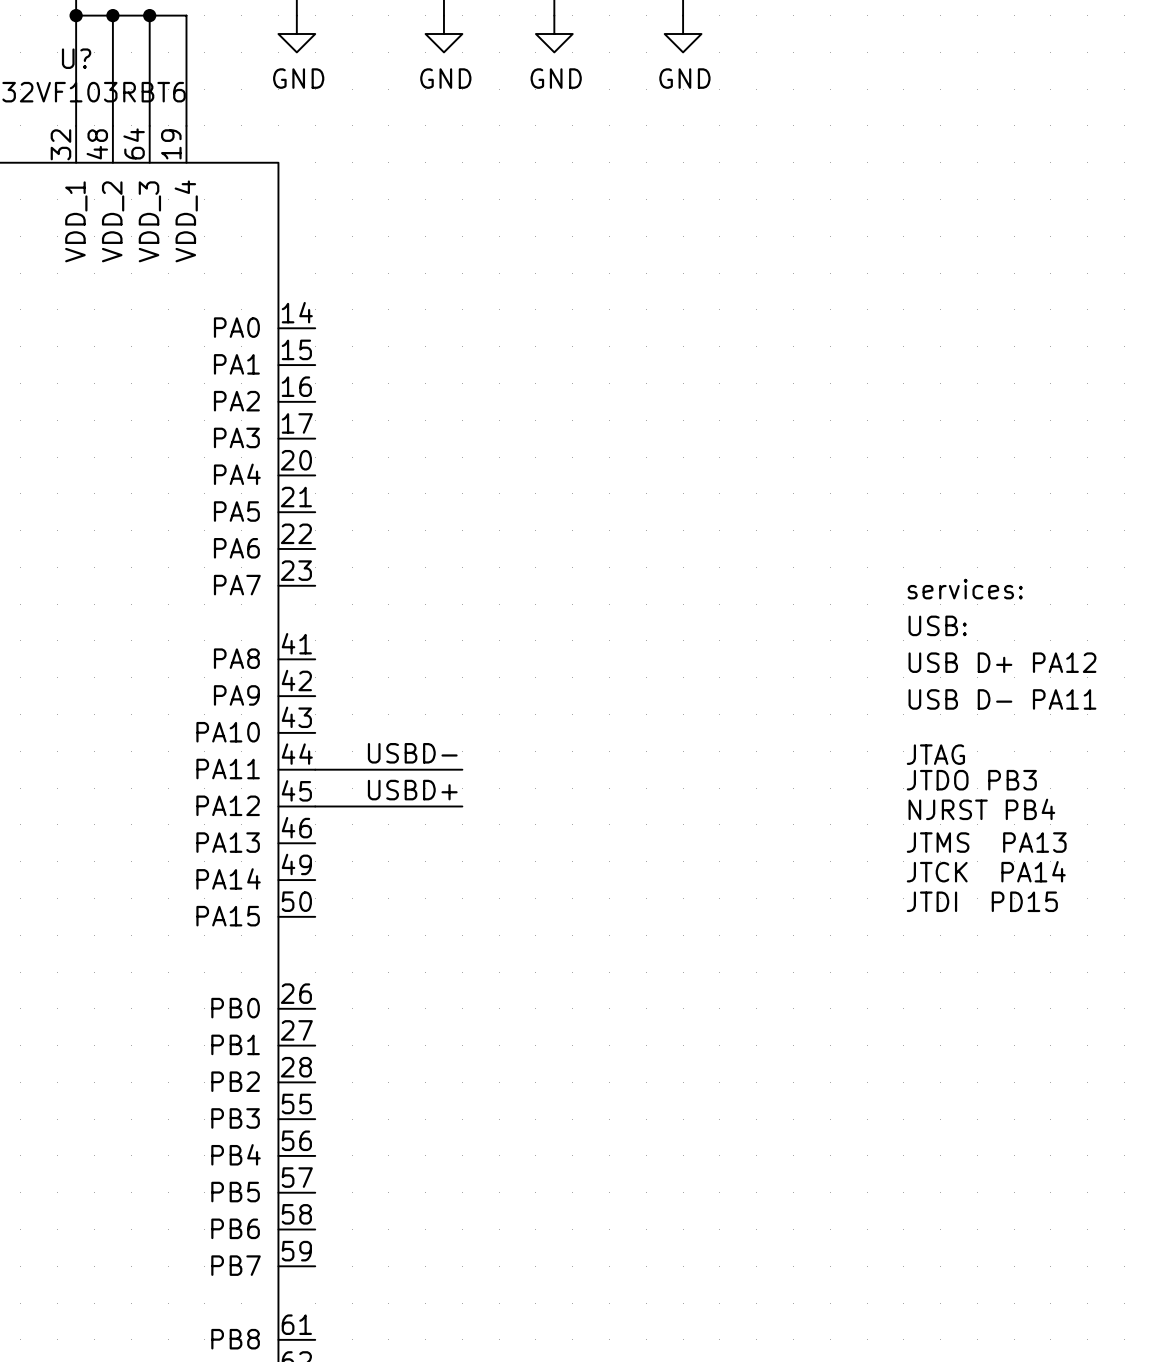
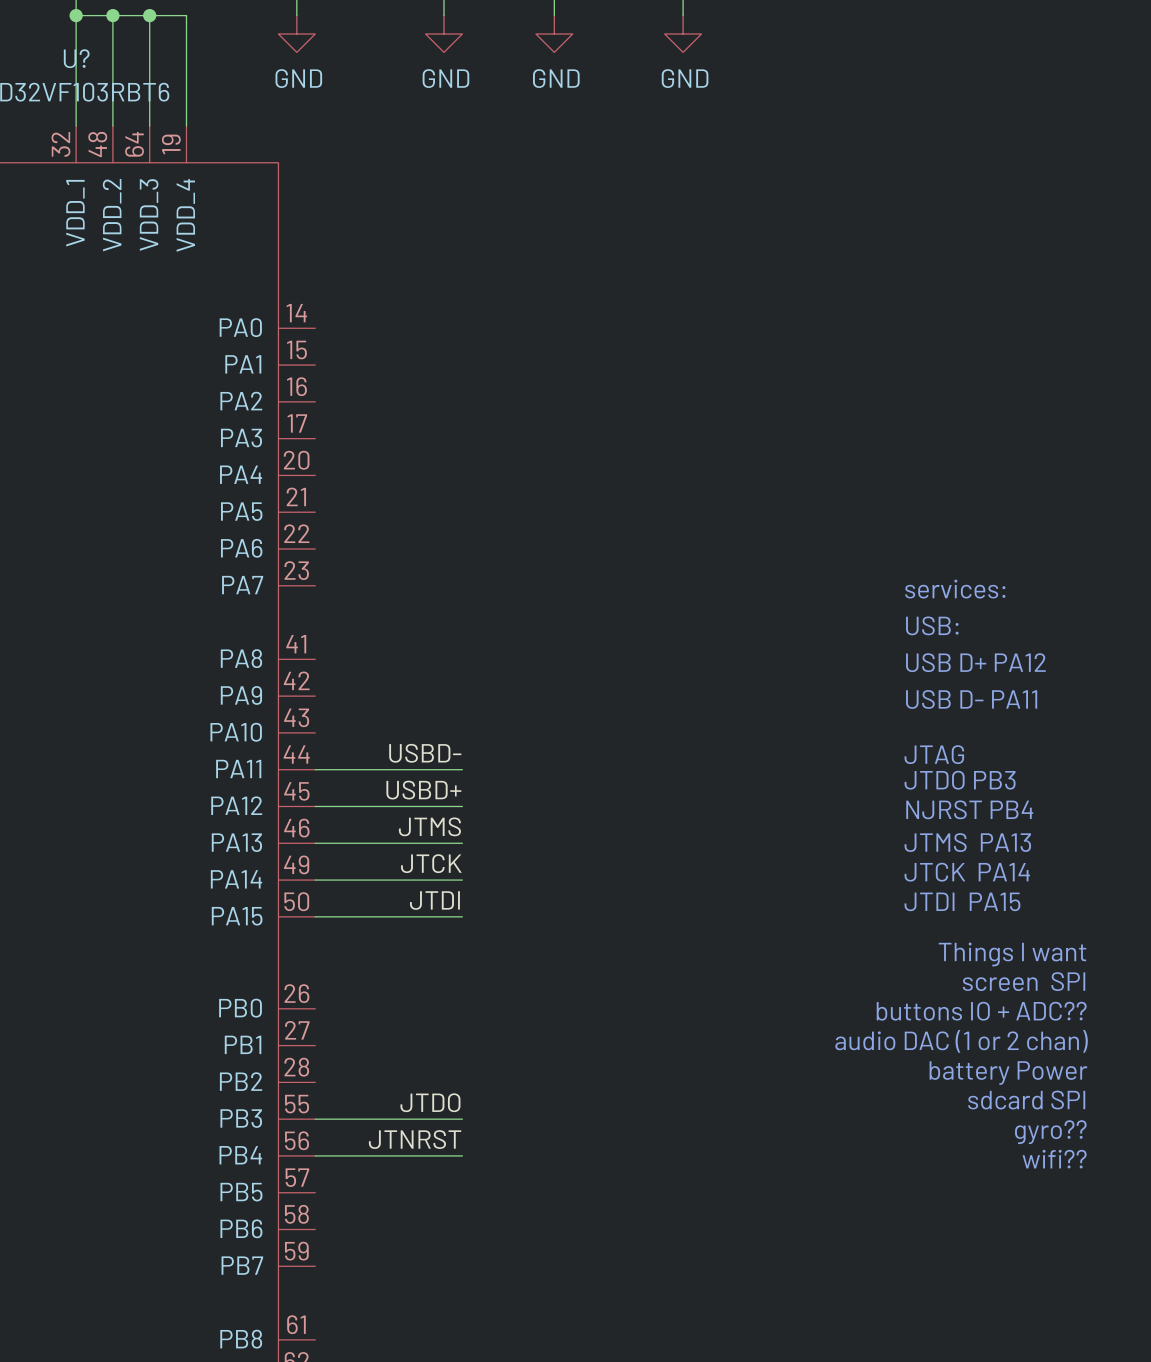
label: none -> JTMS (429, 826)
wire: none -> (315, 843) (462, 843)
label: none -> JTCK (431, 863)
wire: none -> (315, 880) (462, 880)
label: none -> JTDI (434, 900)
text: JTDI PD15 (982, 901) -> JTDI PA15 (962, 901)
wire: none -> (315, 916) (462, 916)
text: none -> Things I want (1012, 954)
text: none -> screen SPI (1024, 981)
text: none -> buttons IO + ADC?? (981, 1011)
text: none -> audio DAC (1 or 2 chan) (961, 1041)
text: none -> battery Power (1008, 1073)
text: none -> sdcard SPI (1026, 1100)
label: none -> JTDO (430, 1102)
wire: none -> (315, 1119) (462, 1119)
text: none -> gyro?? (1050, 1132)
label: none -> JTNRST (415, 1139)
wire: none -> (315, 1155) (462, 1155)
text: none -> wifi?? (1054, 1159)

